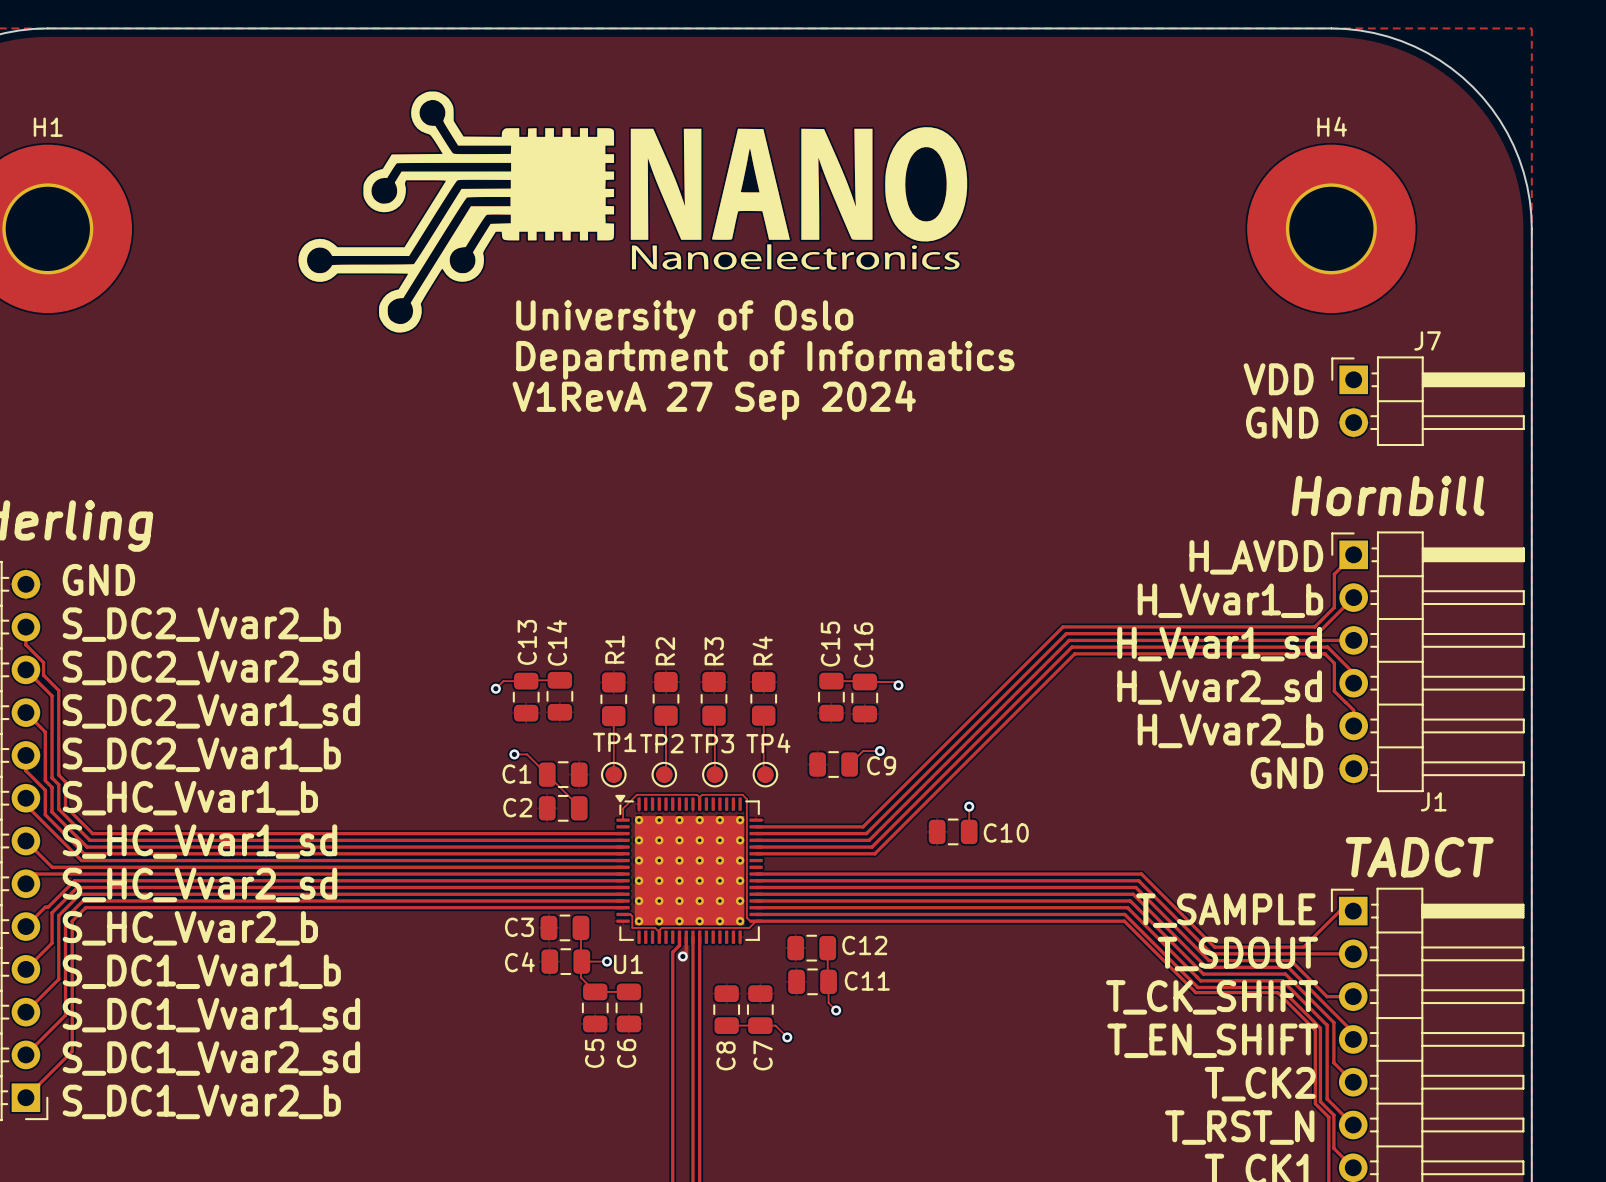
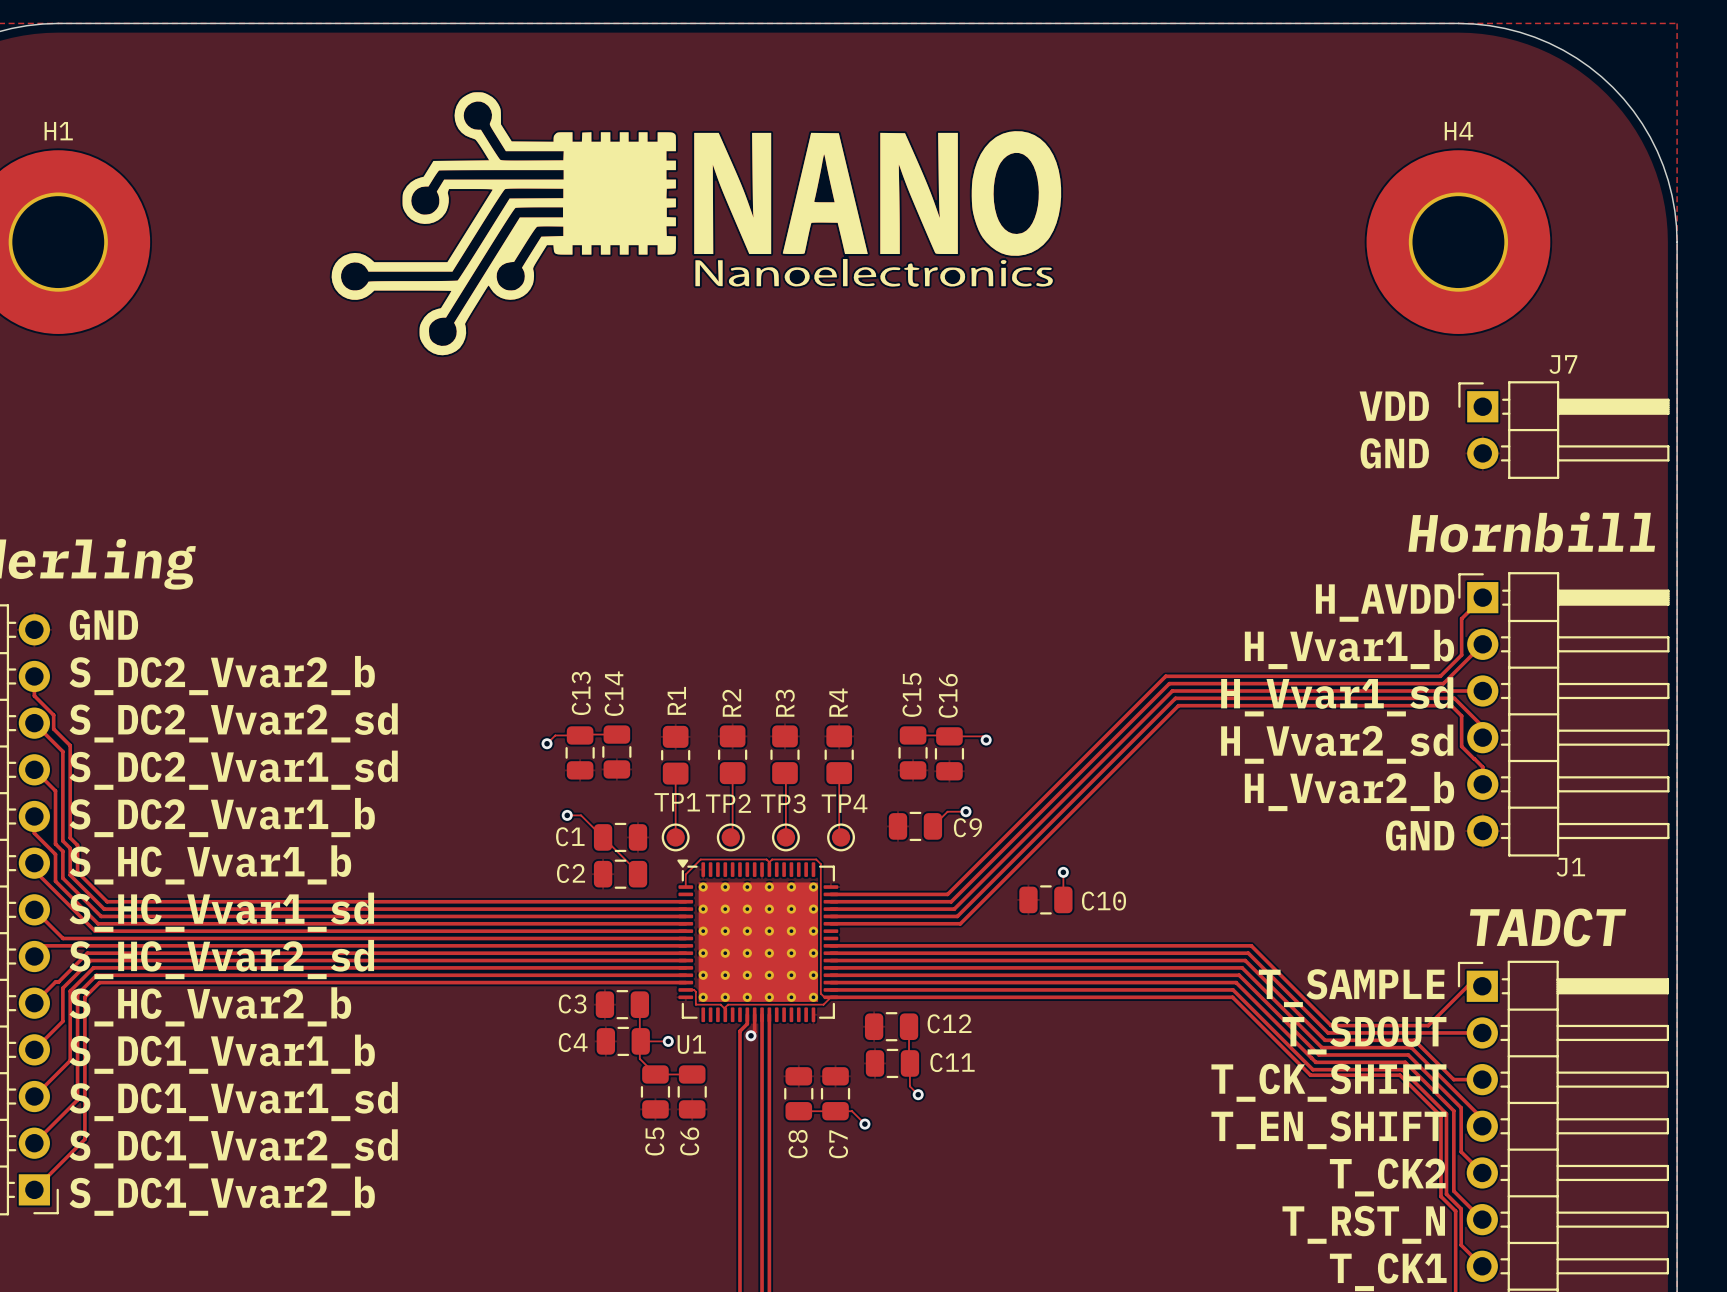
text: University of Oslo (684, 319) -> none
text: Department of Informatics (765, 360) -> none
text: V1RevA 27 Sep 2024 (714, 400) -> none

